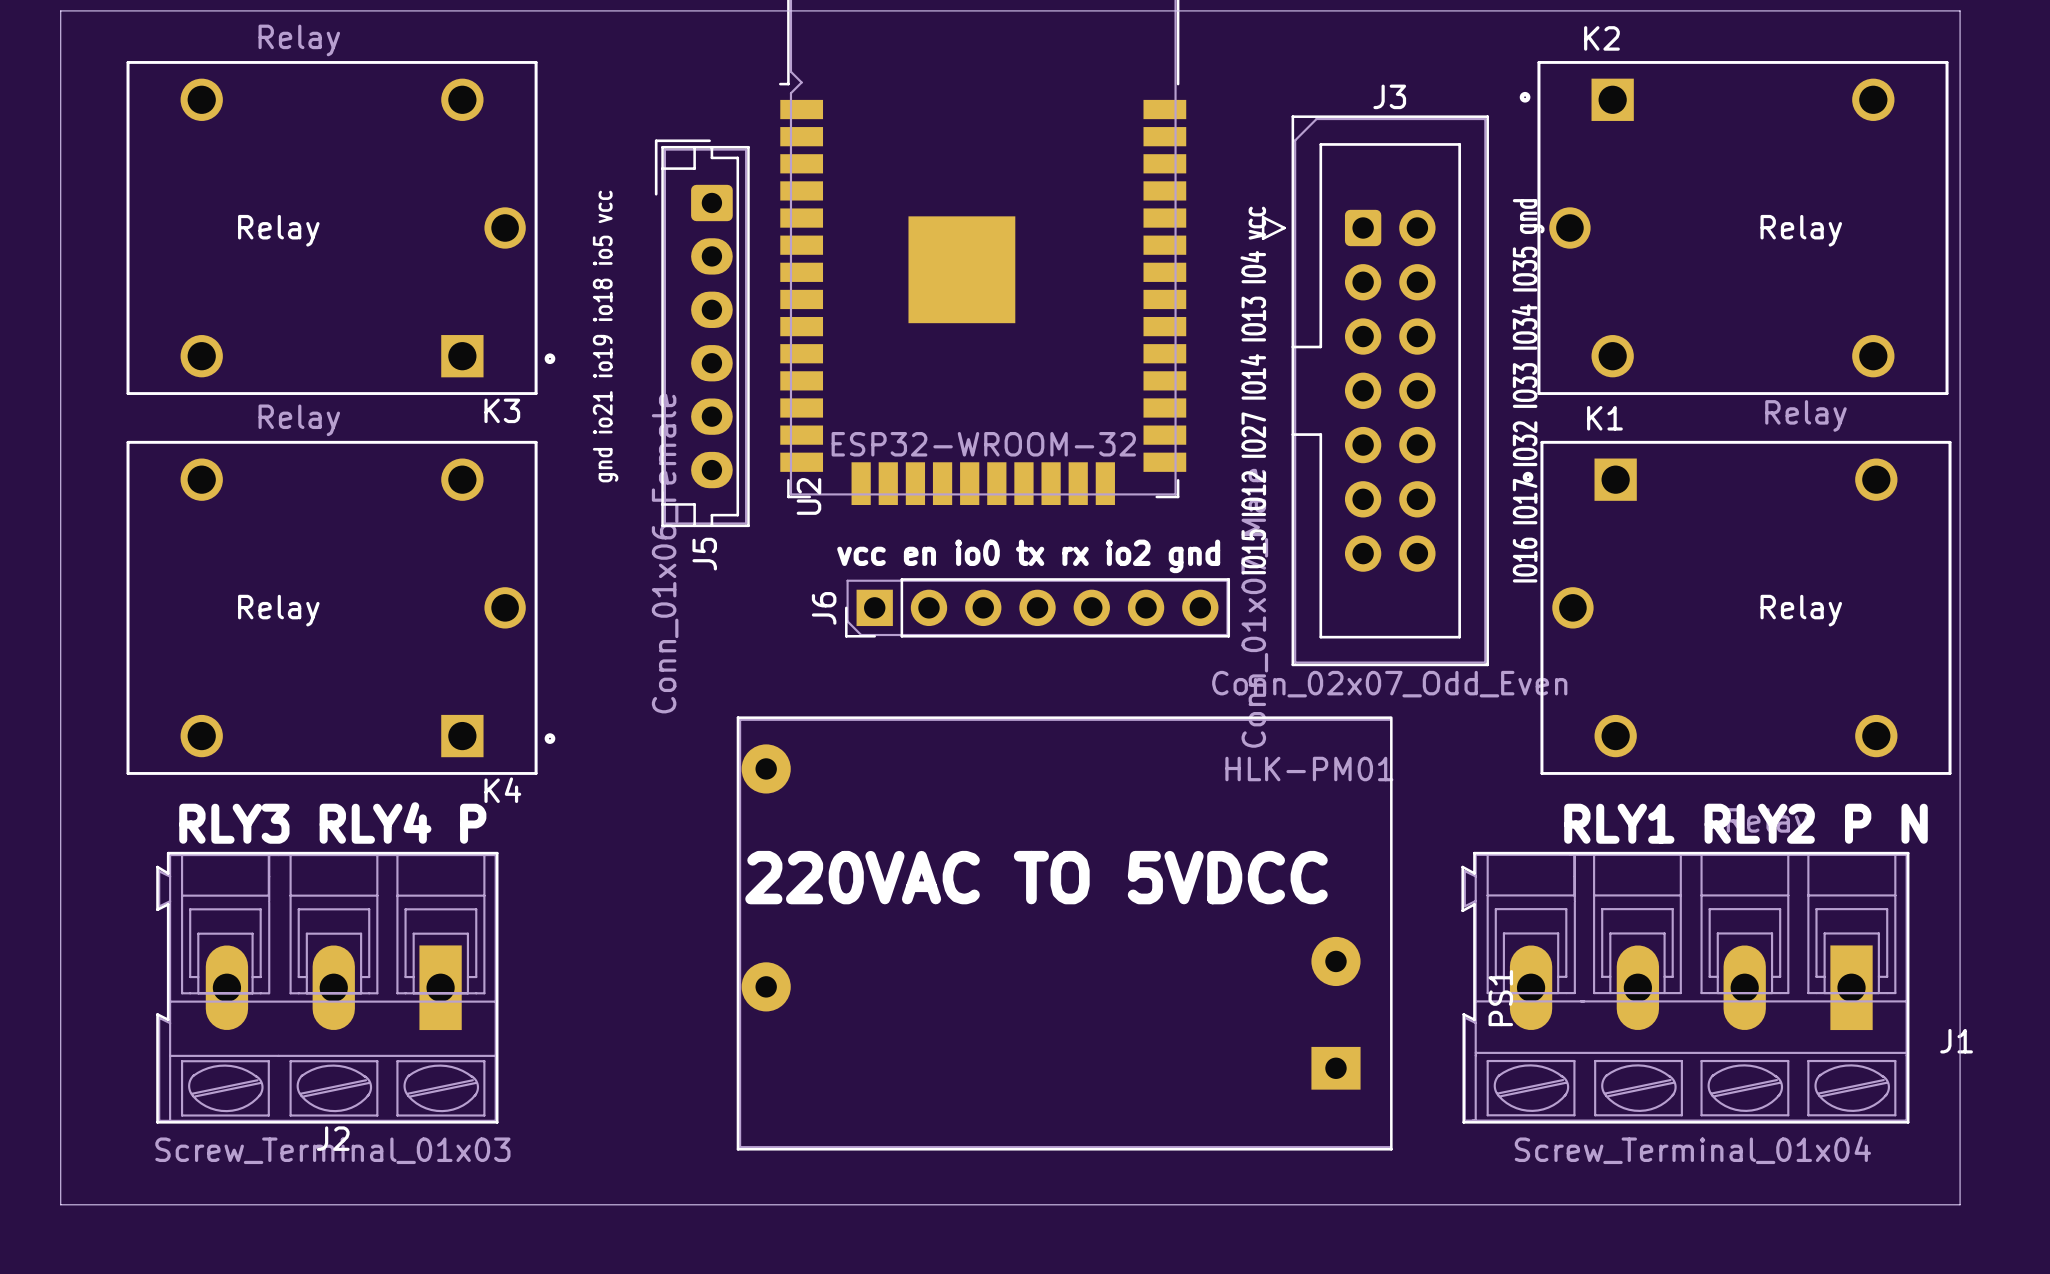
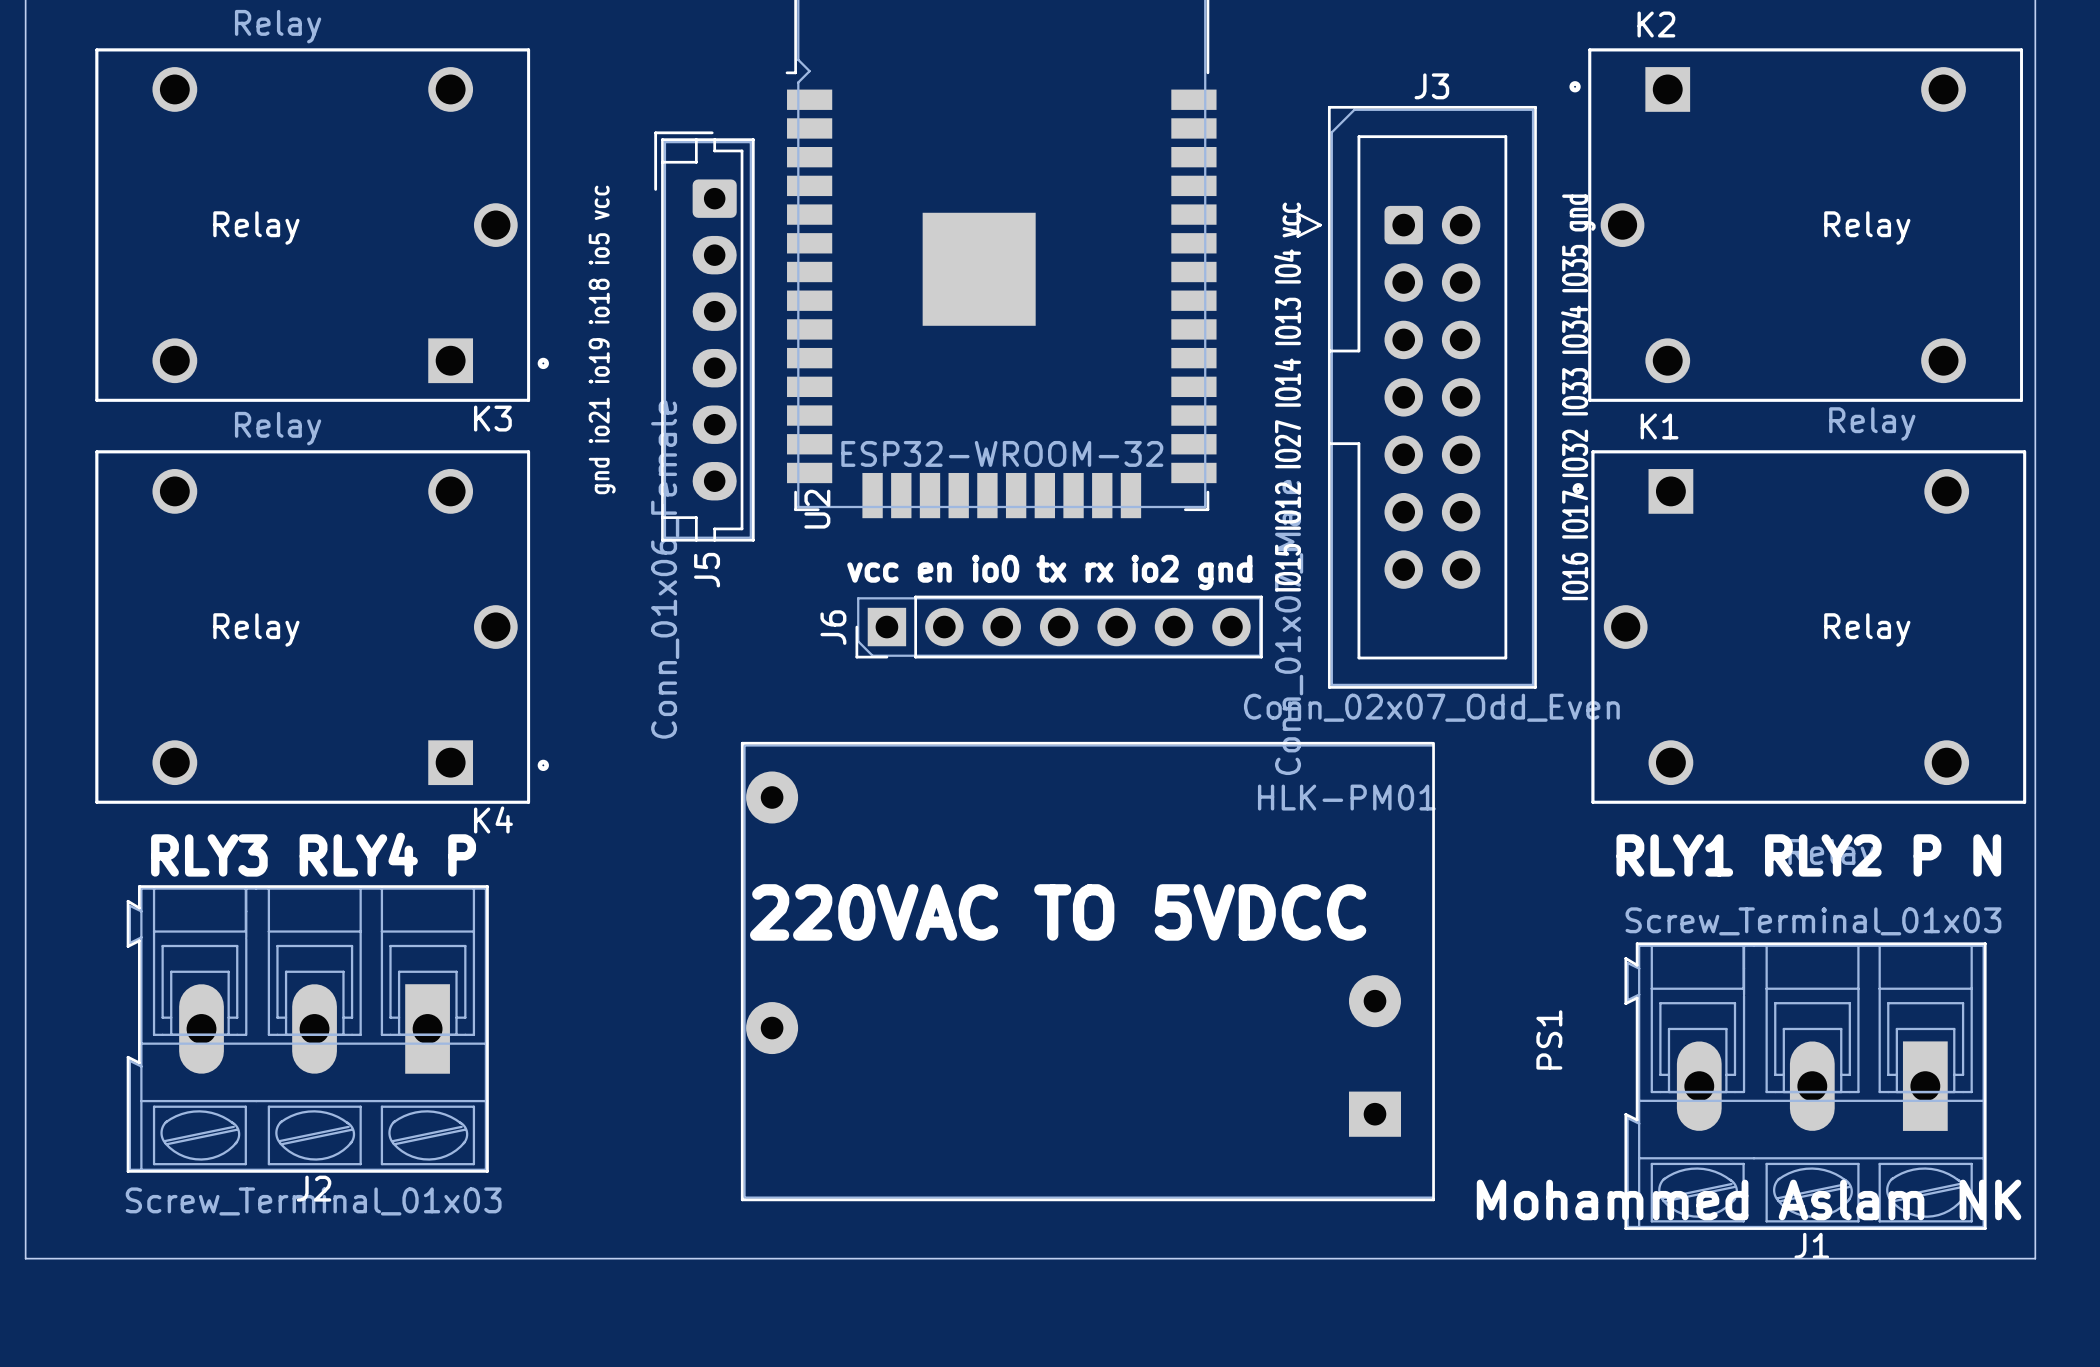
J1 footprint: [1461, 851, 1910, 1124] -> [1624, 942, 1987, 1230]
J1 name position: J1 (1956, 1041) -> J1 (1811, 1245)
text: none -> Mohammed Aslam NK (1749, 1199)
J1 value: Screw_Terminal_01x04 (1692, 1150) -> Screw_Terminal_01x03 (1813, 921)

